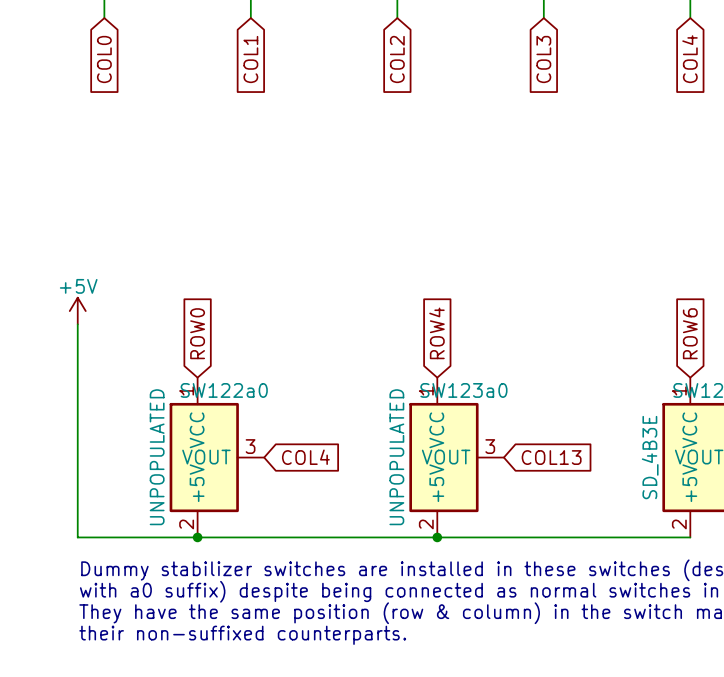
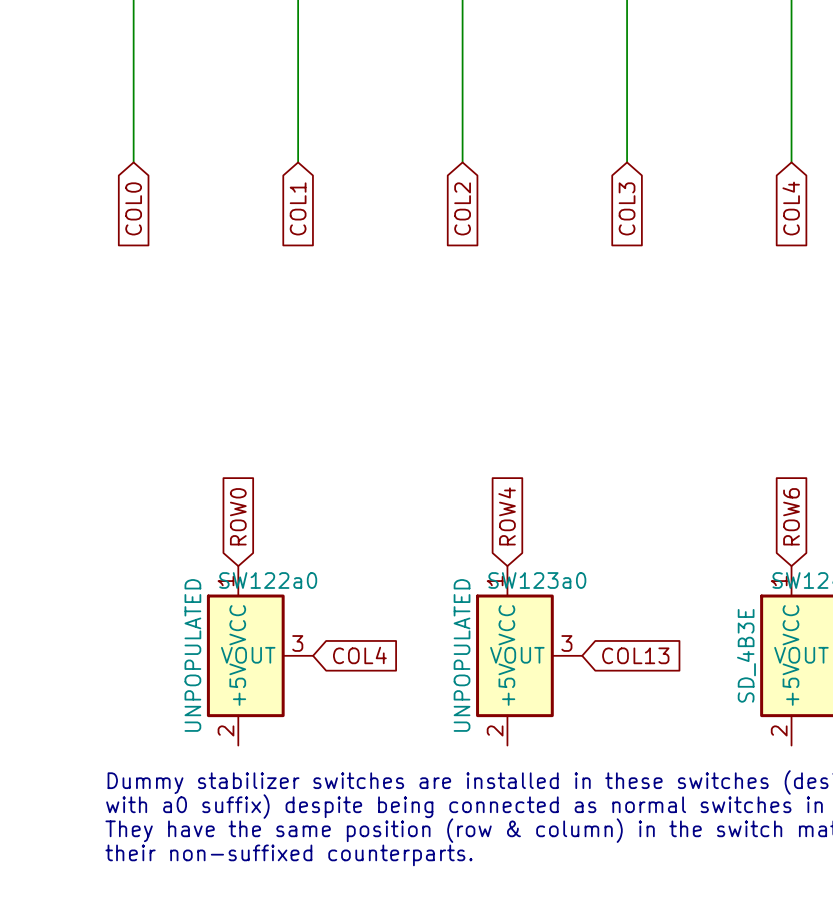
power symbol: +5V (77, 311) -> none
wire: (77, 324) (77, 537) (690, 537) -> none
junction: (197, 537) -> none
junction: (437, 537) -> none

